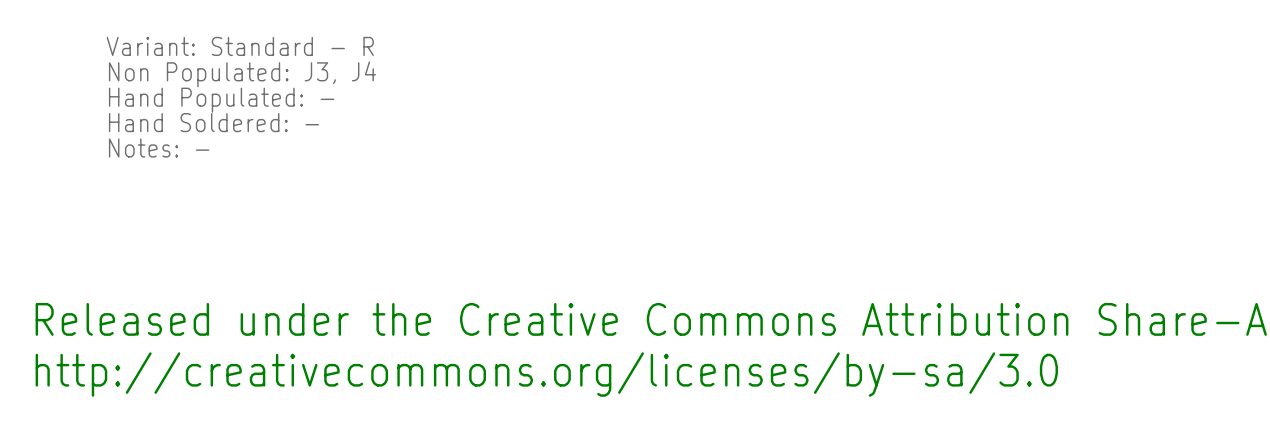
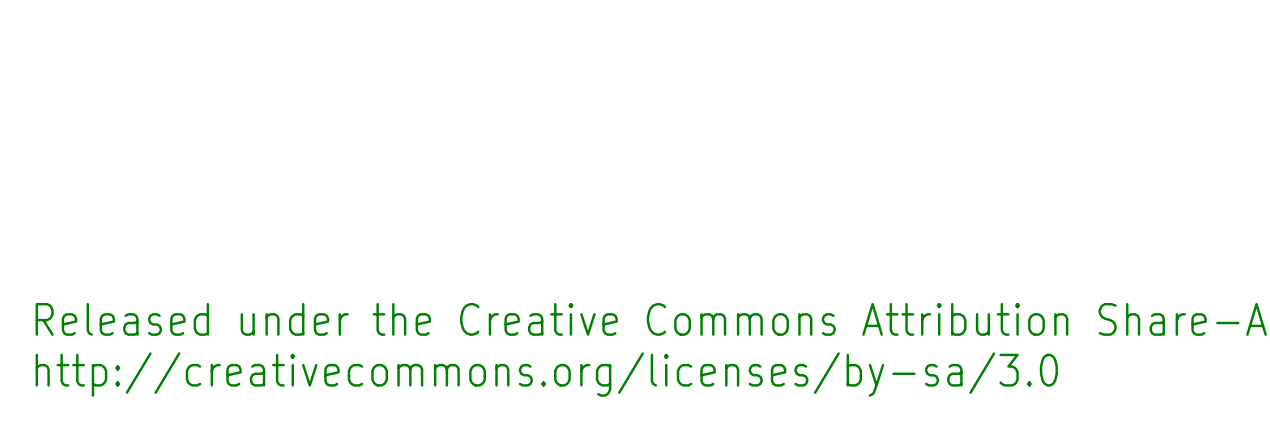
text: Variant: Standard - R (240, 46) -> none
text: Non Populated: J3, J4 (242, 74) -> none
text: Hand Populated: - (221, 100) -> none
text: Hand Soldered: - (213, 122) -> none
text: Notes: - (159, 147) -> none

